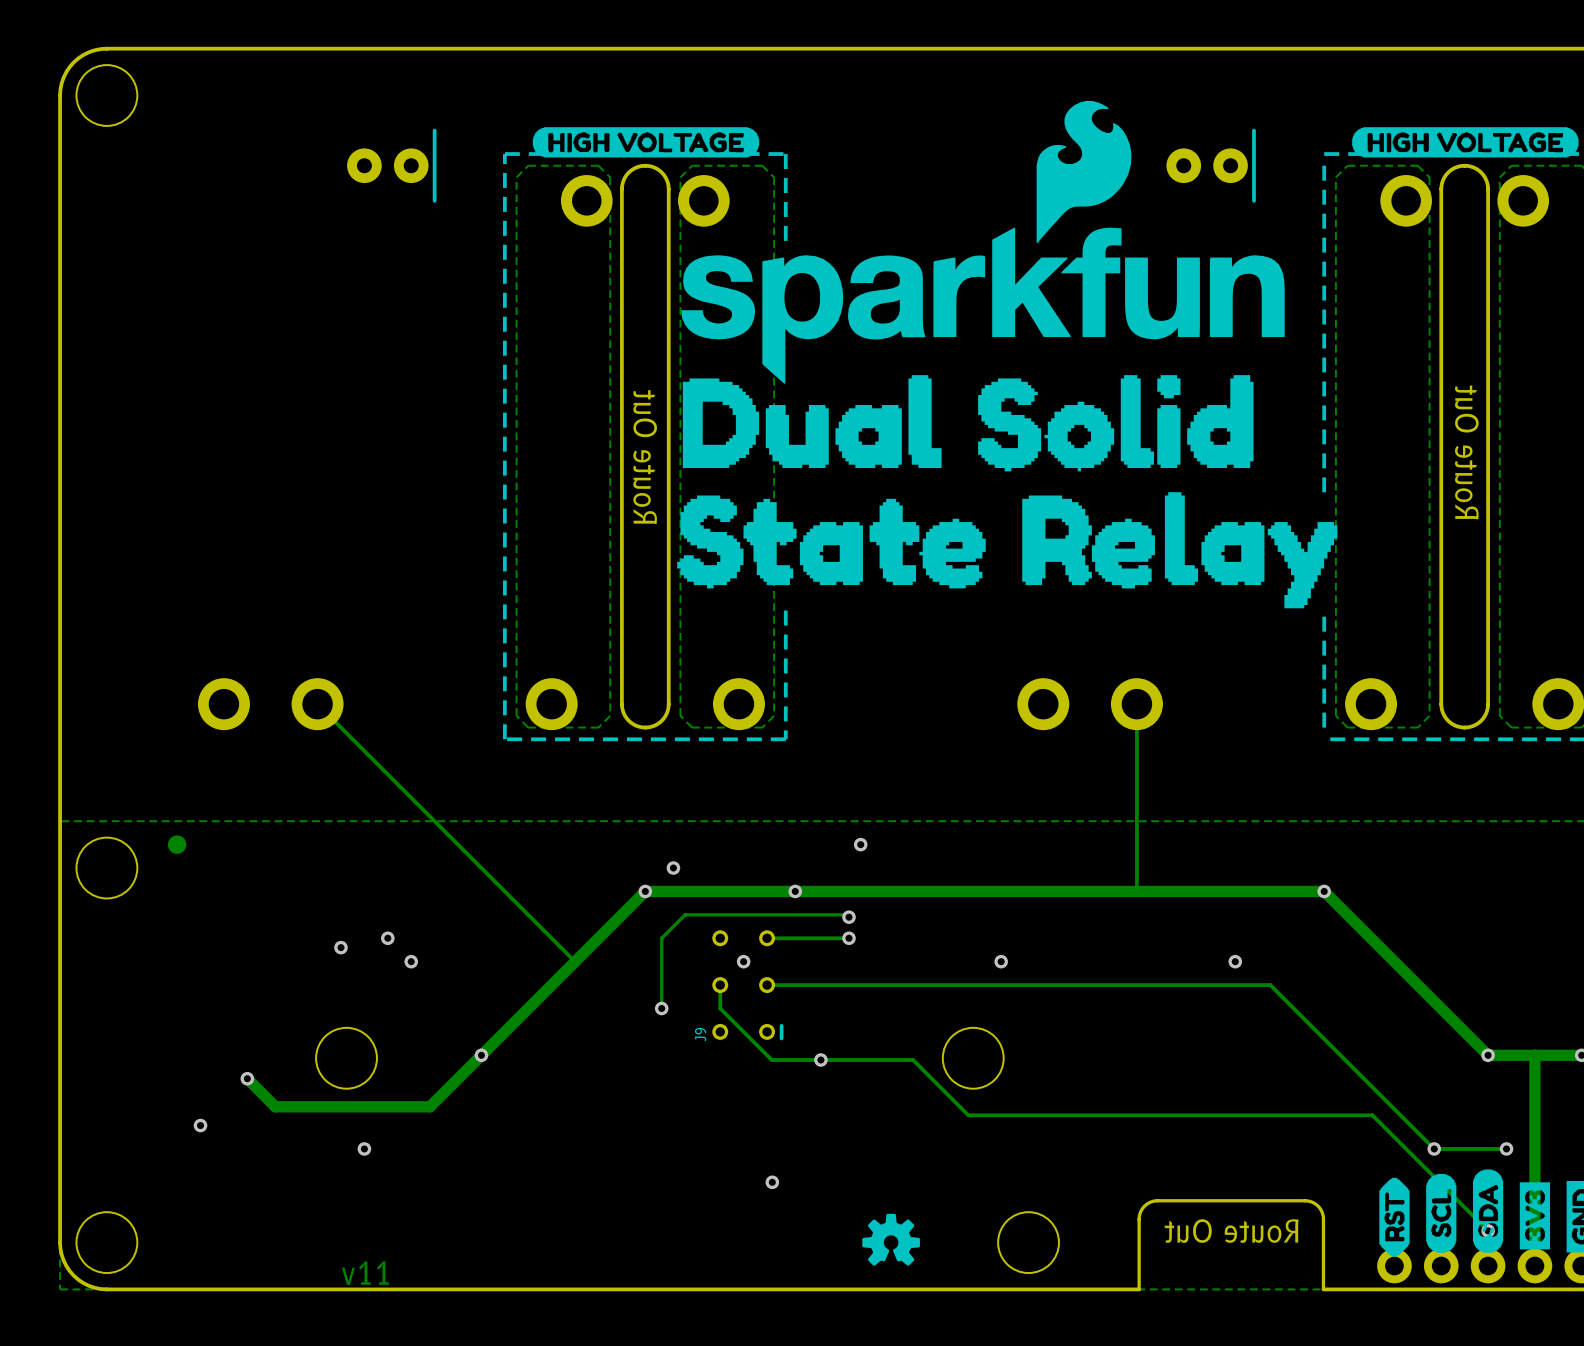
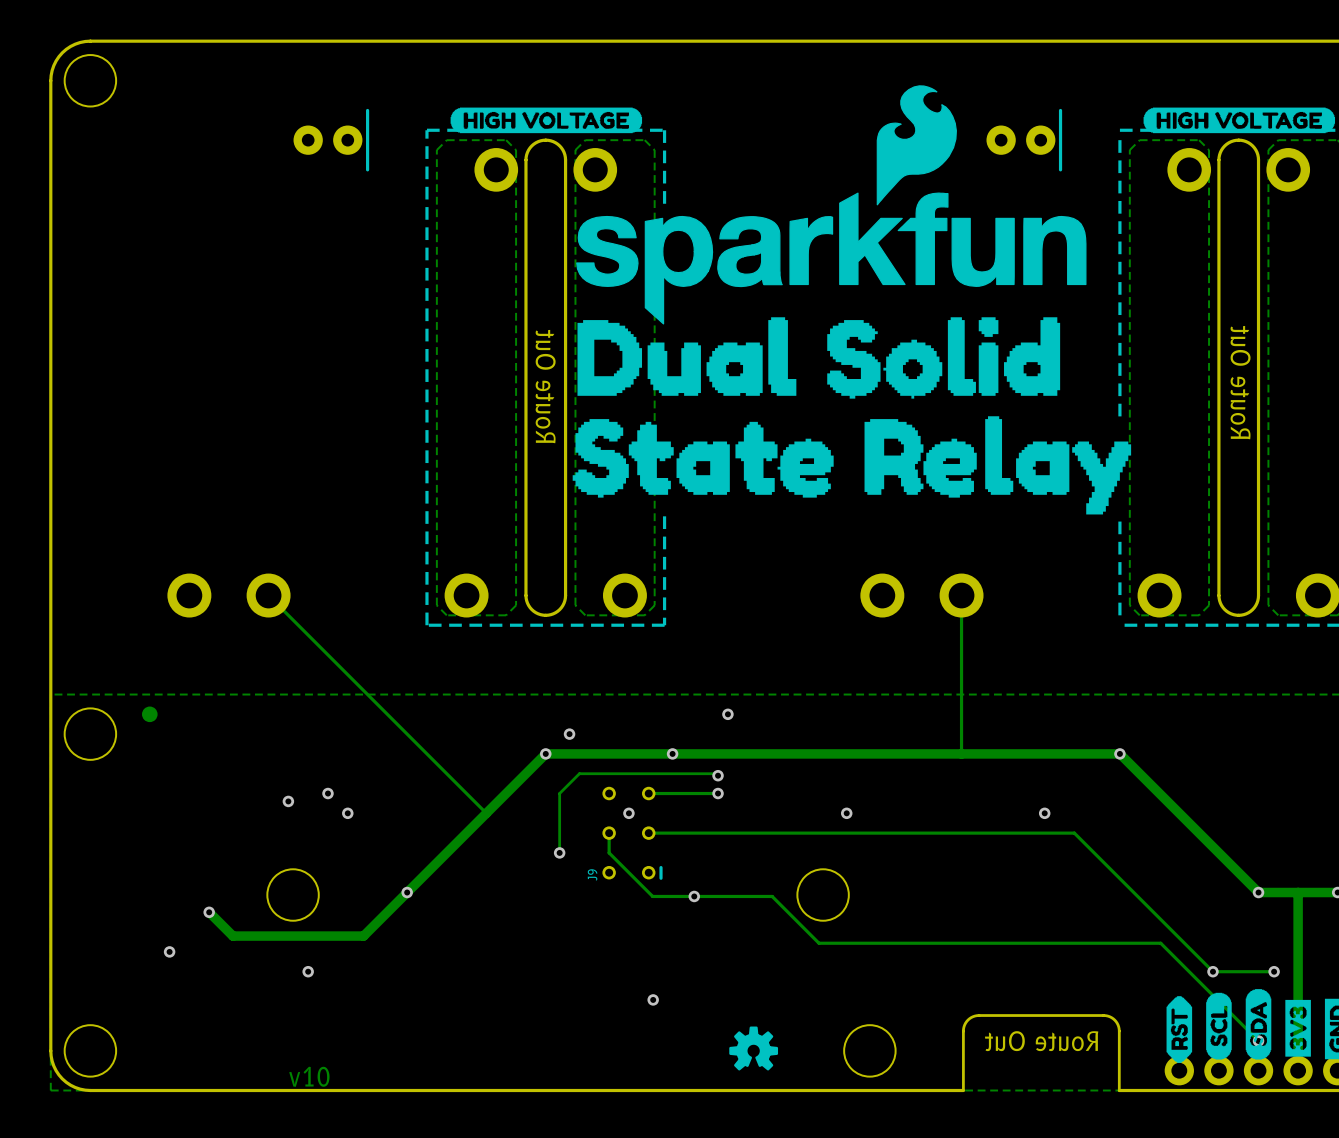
text: v11 (365, 1273) -> v10 (309, 1076)

